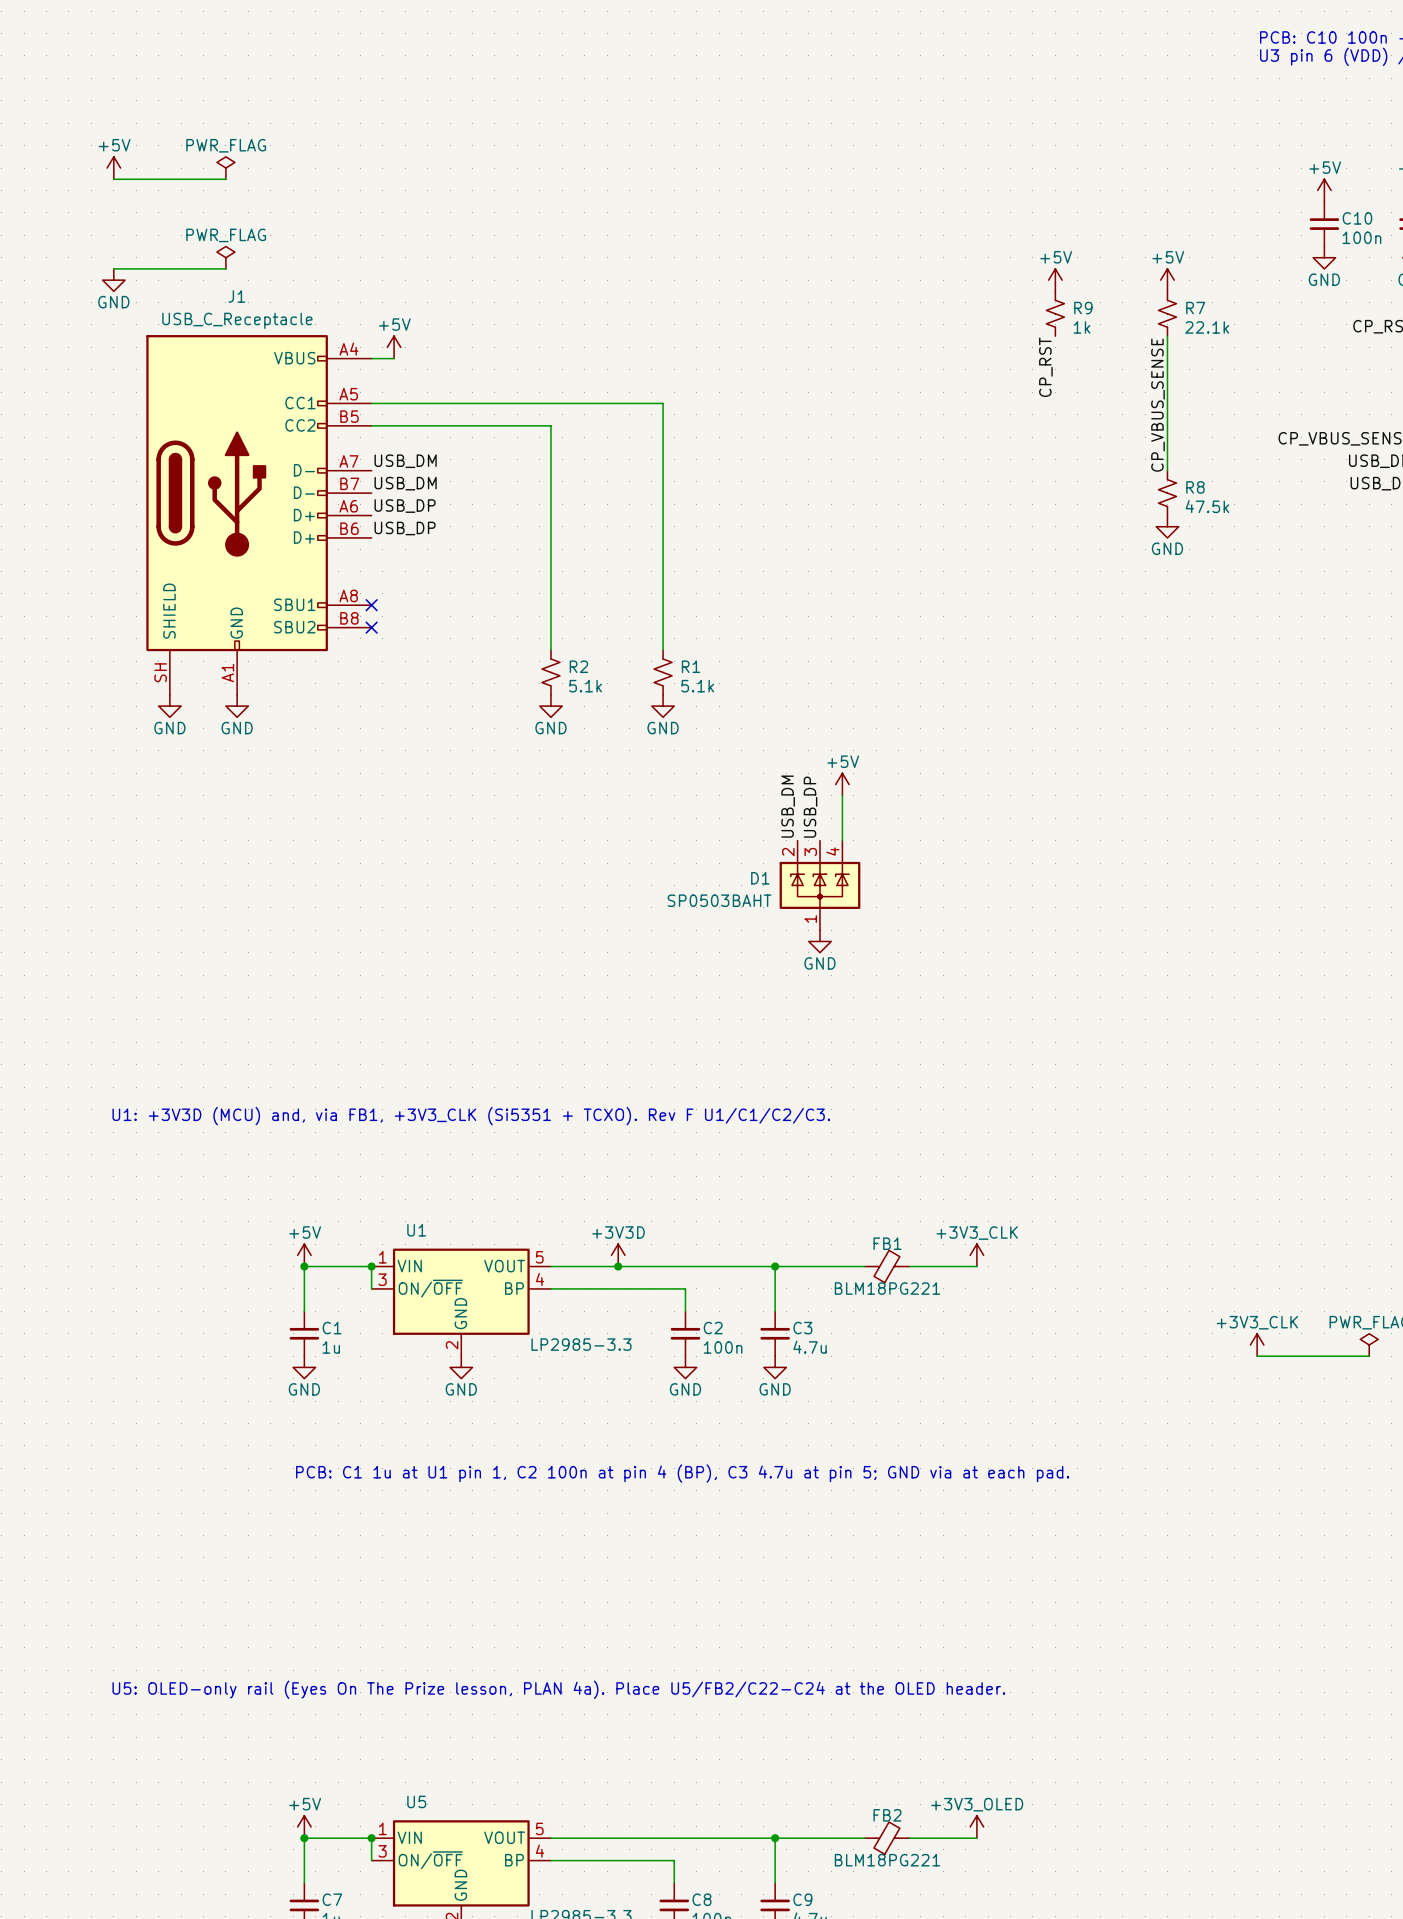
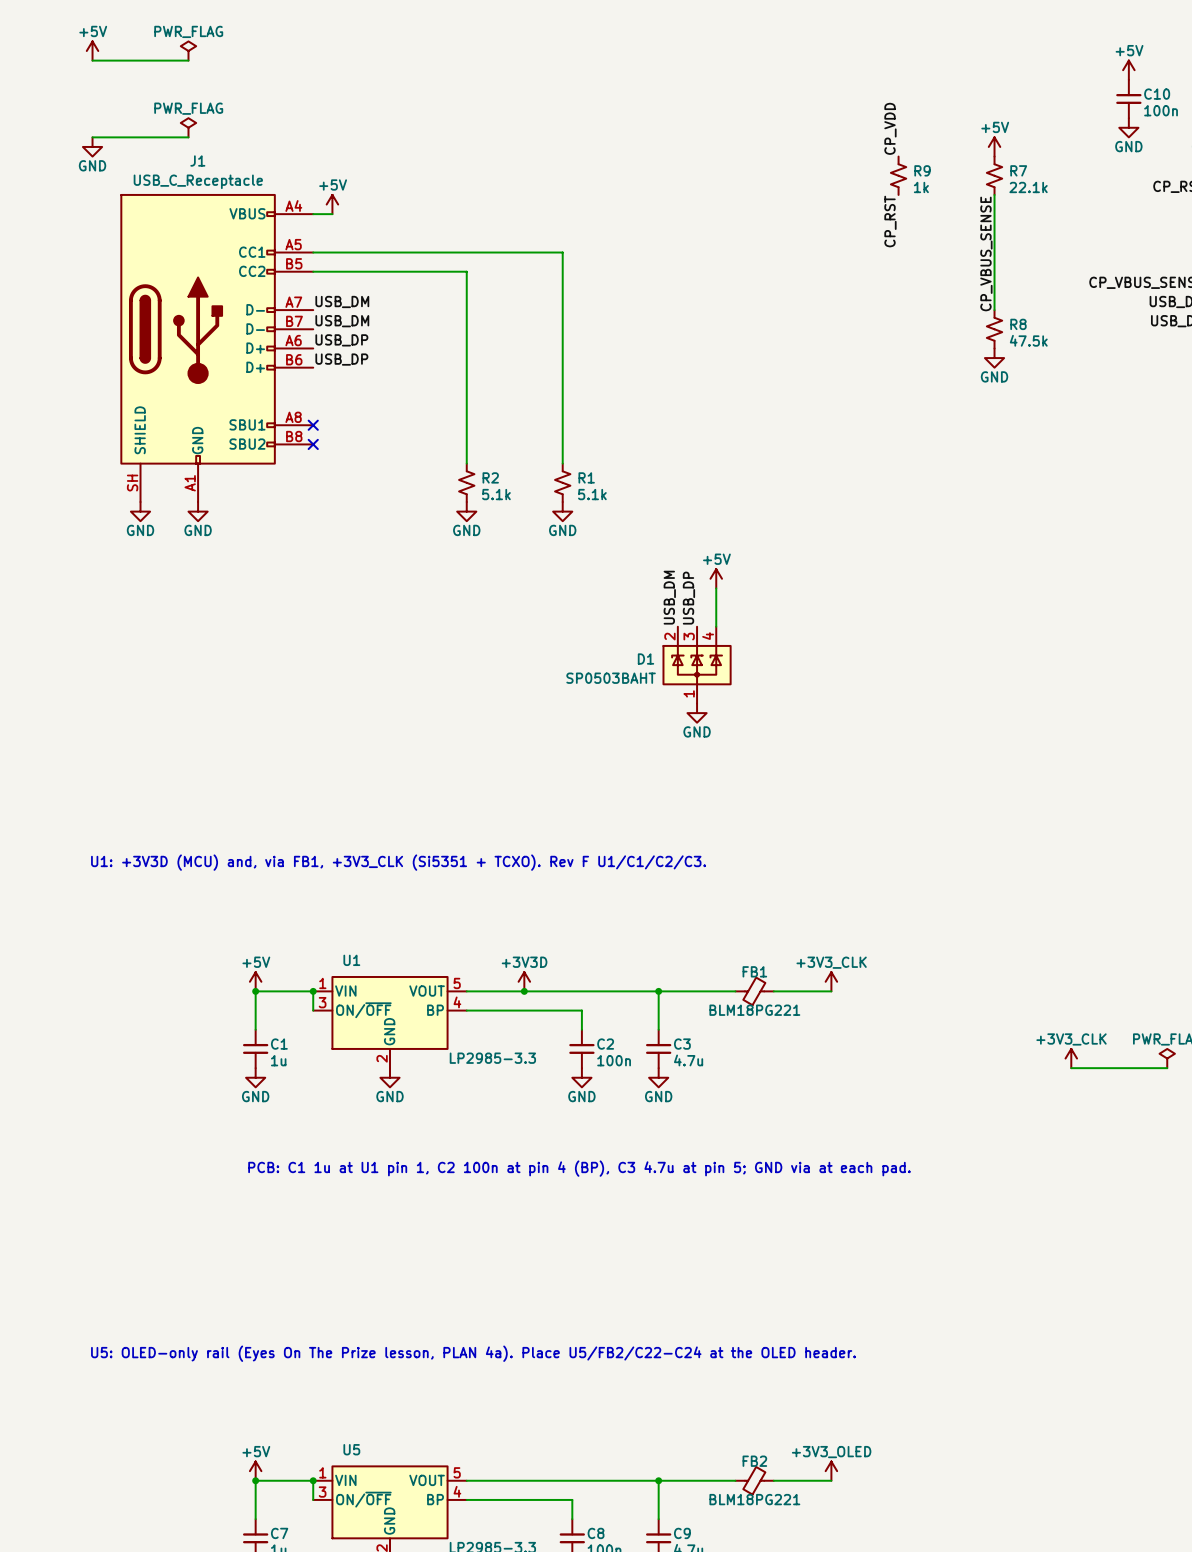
label: none -> CP_VDD (890, 128)
power symbol: +5V (1055, 280) -> none

